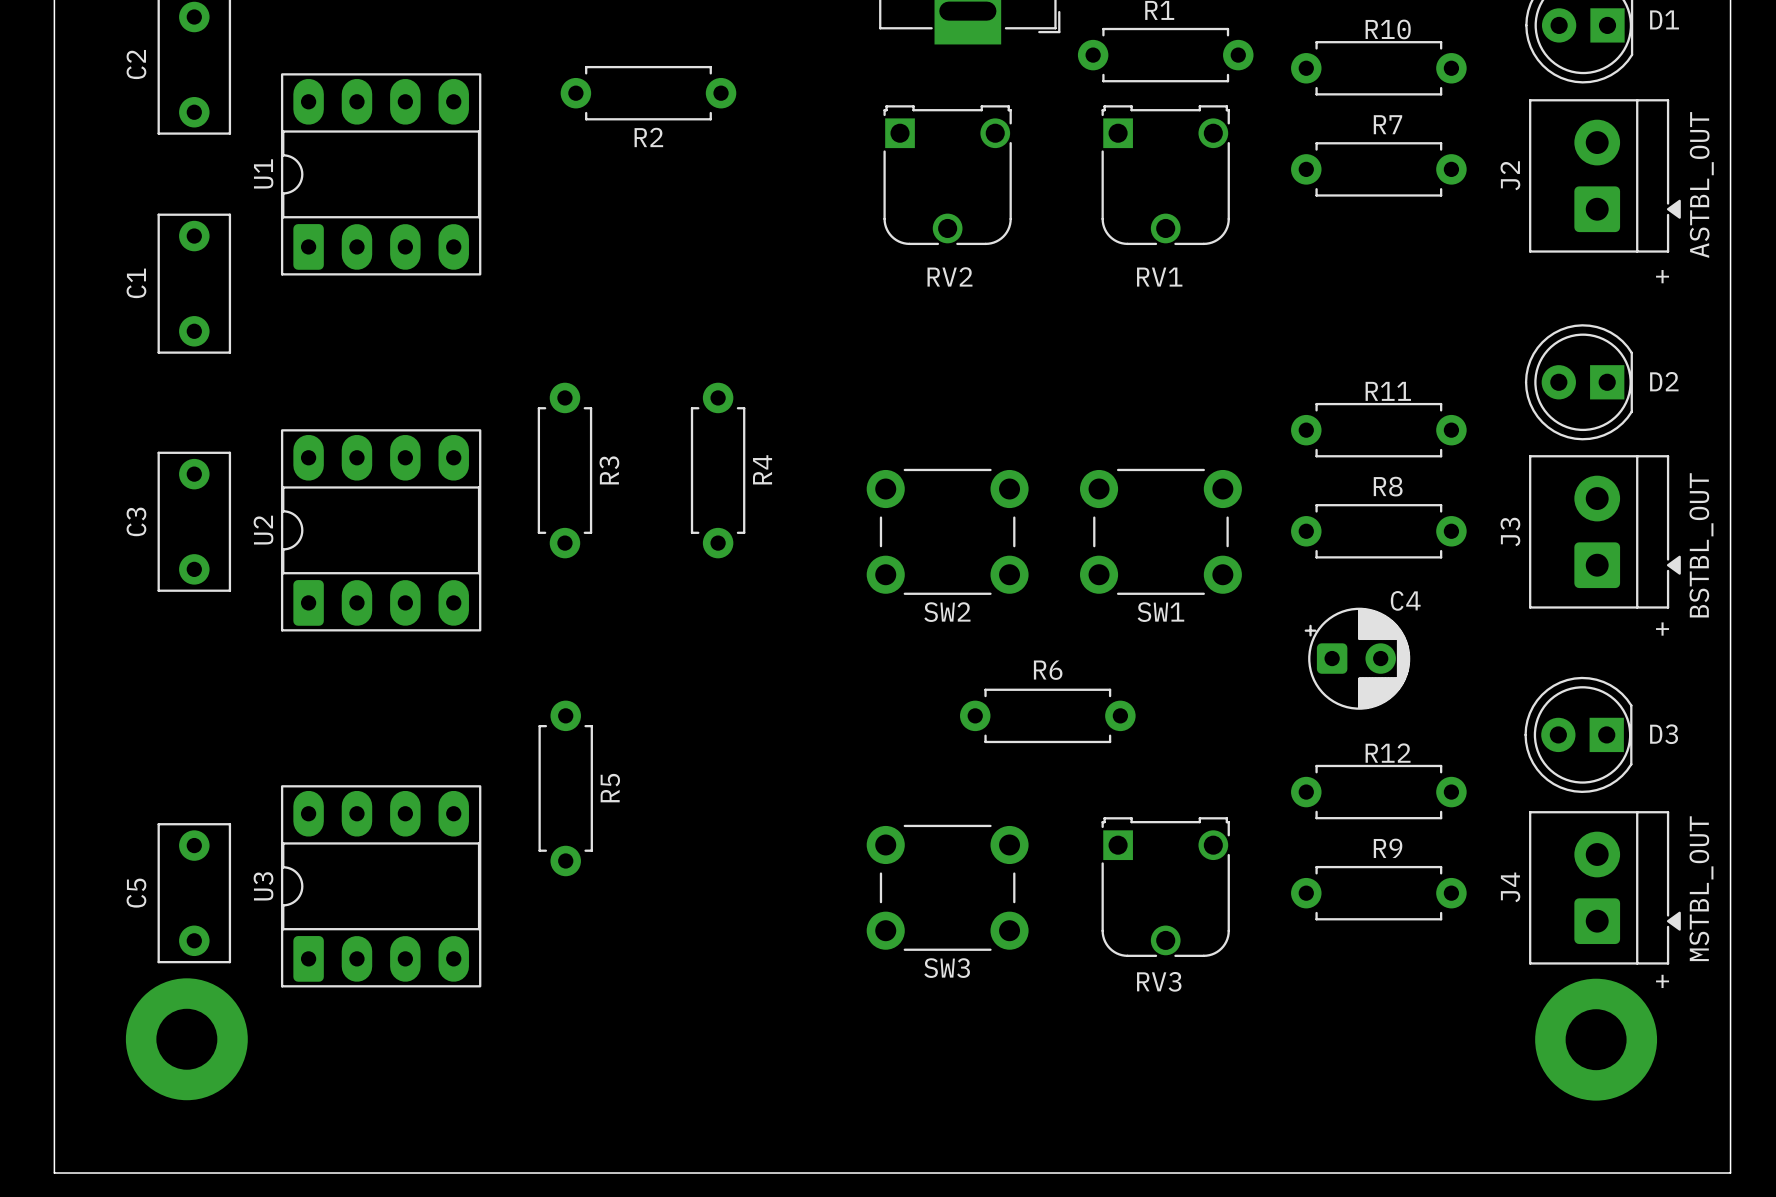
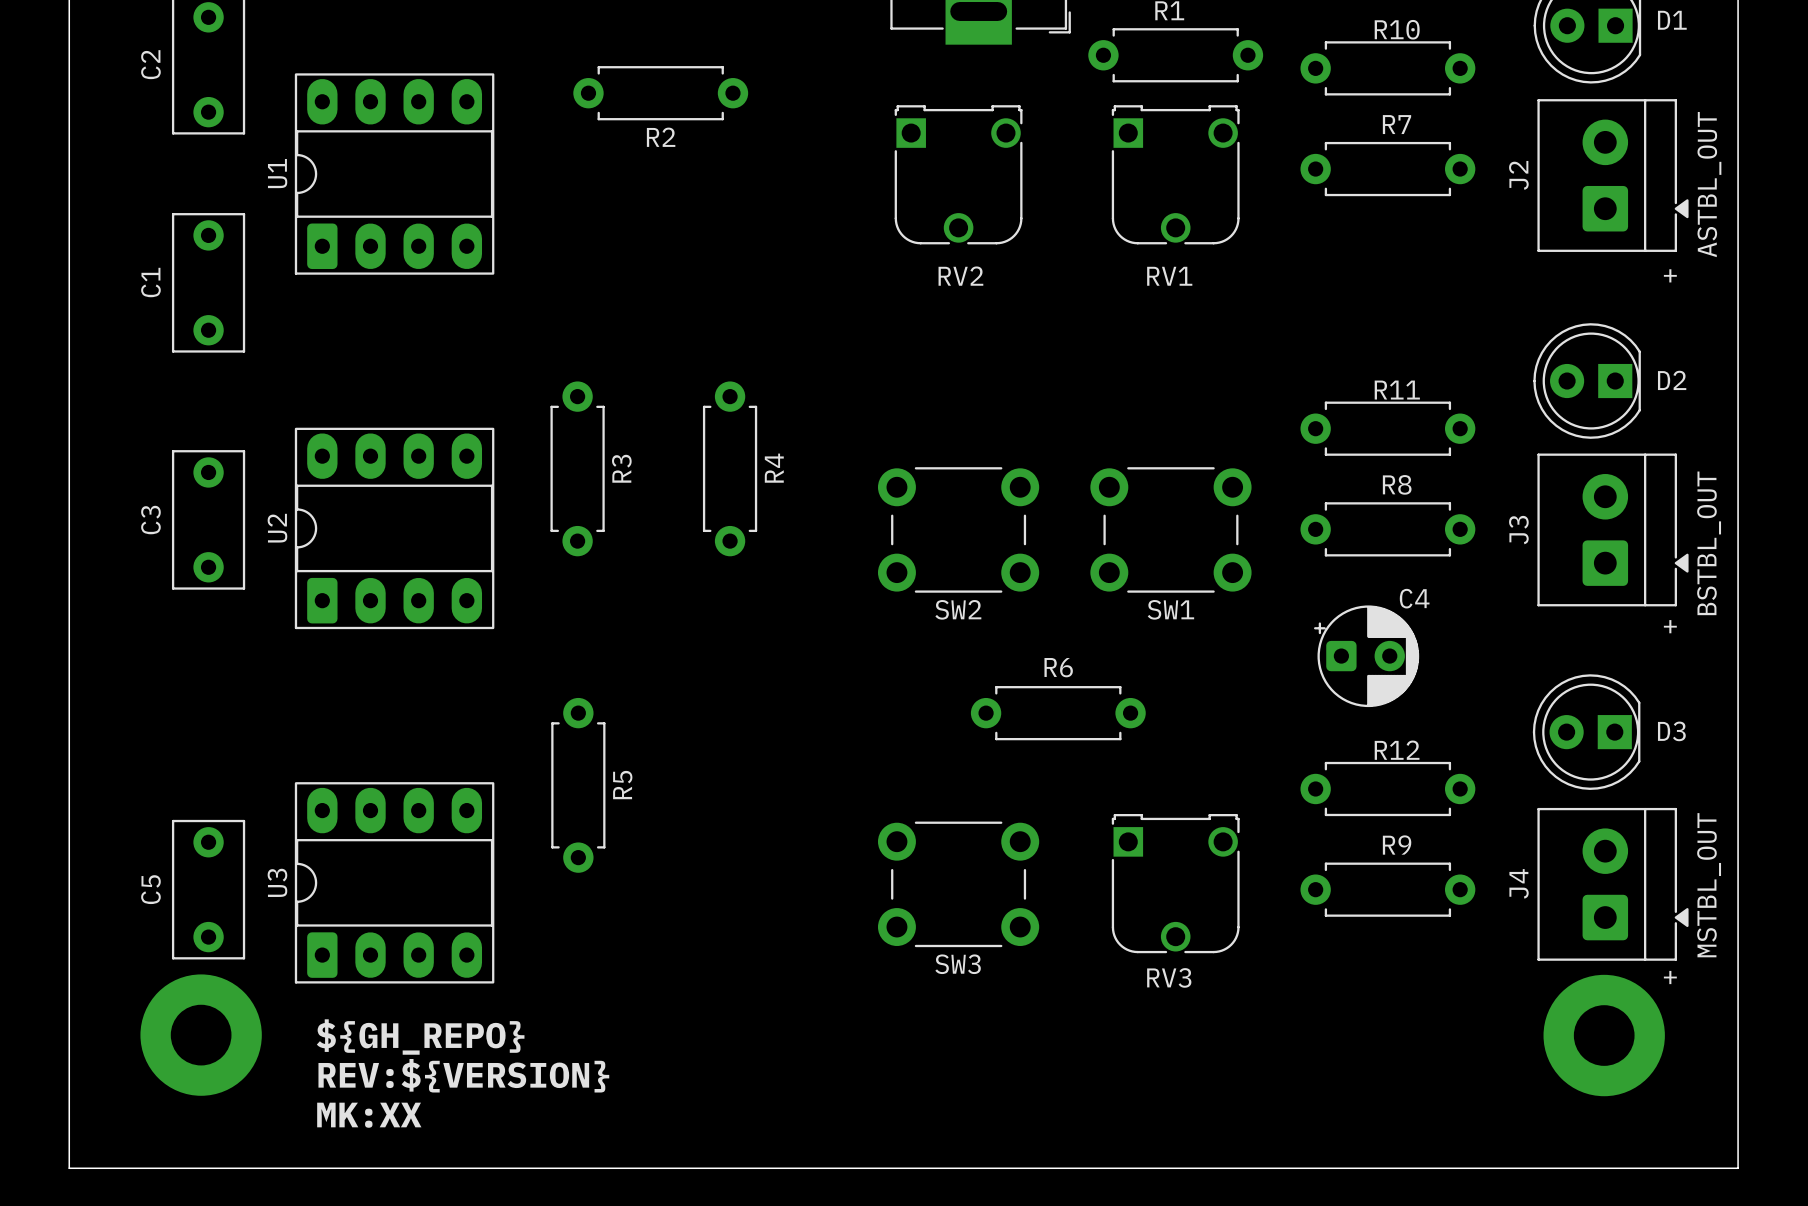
text: none -> ${GH_REPO} (420, 1037)
text: none -> REV:${VERSION} (463, 1075)
text: none -> MK:XX (369, 1115)

